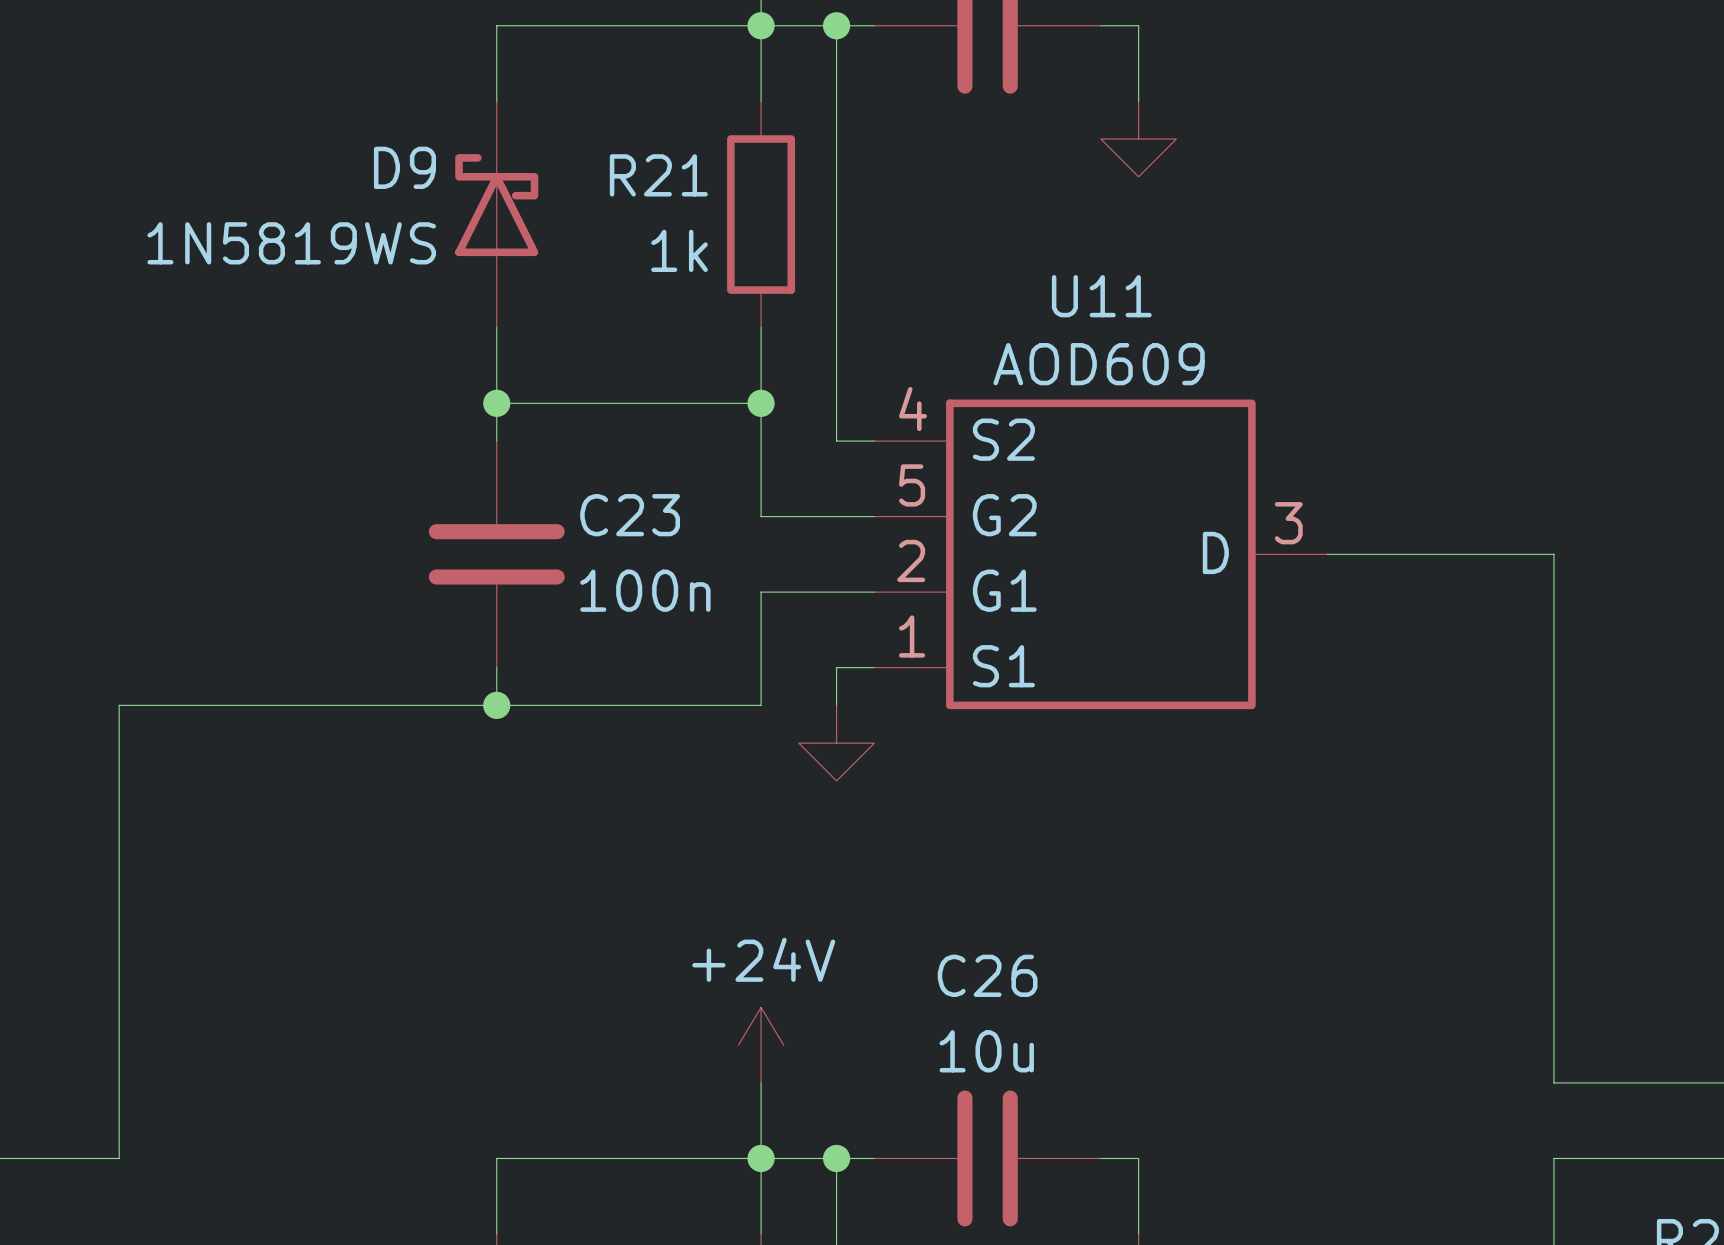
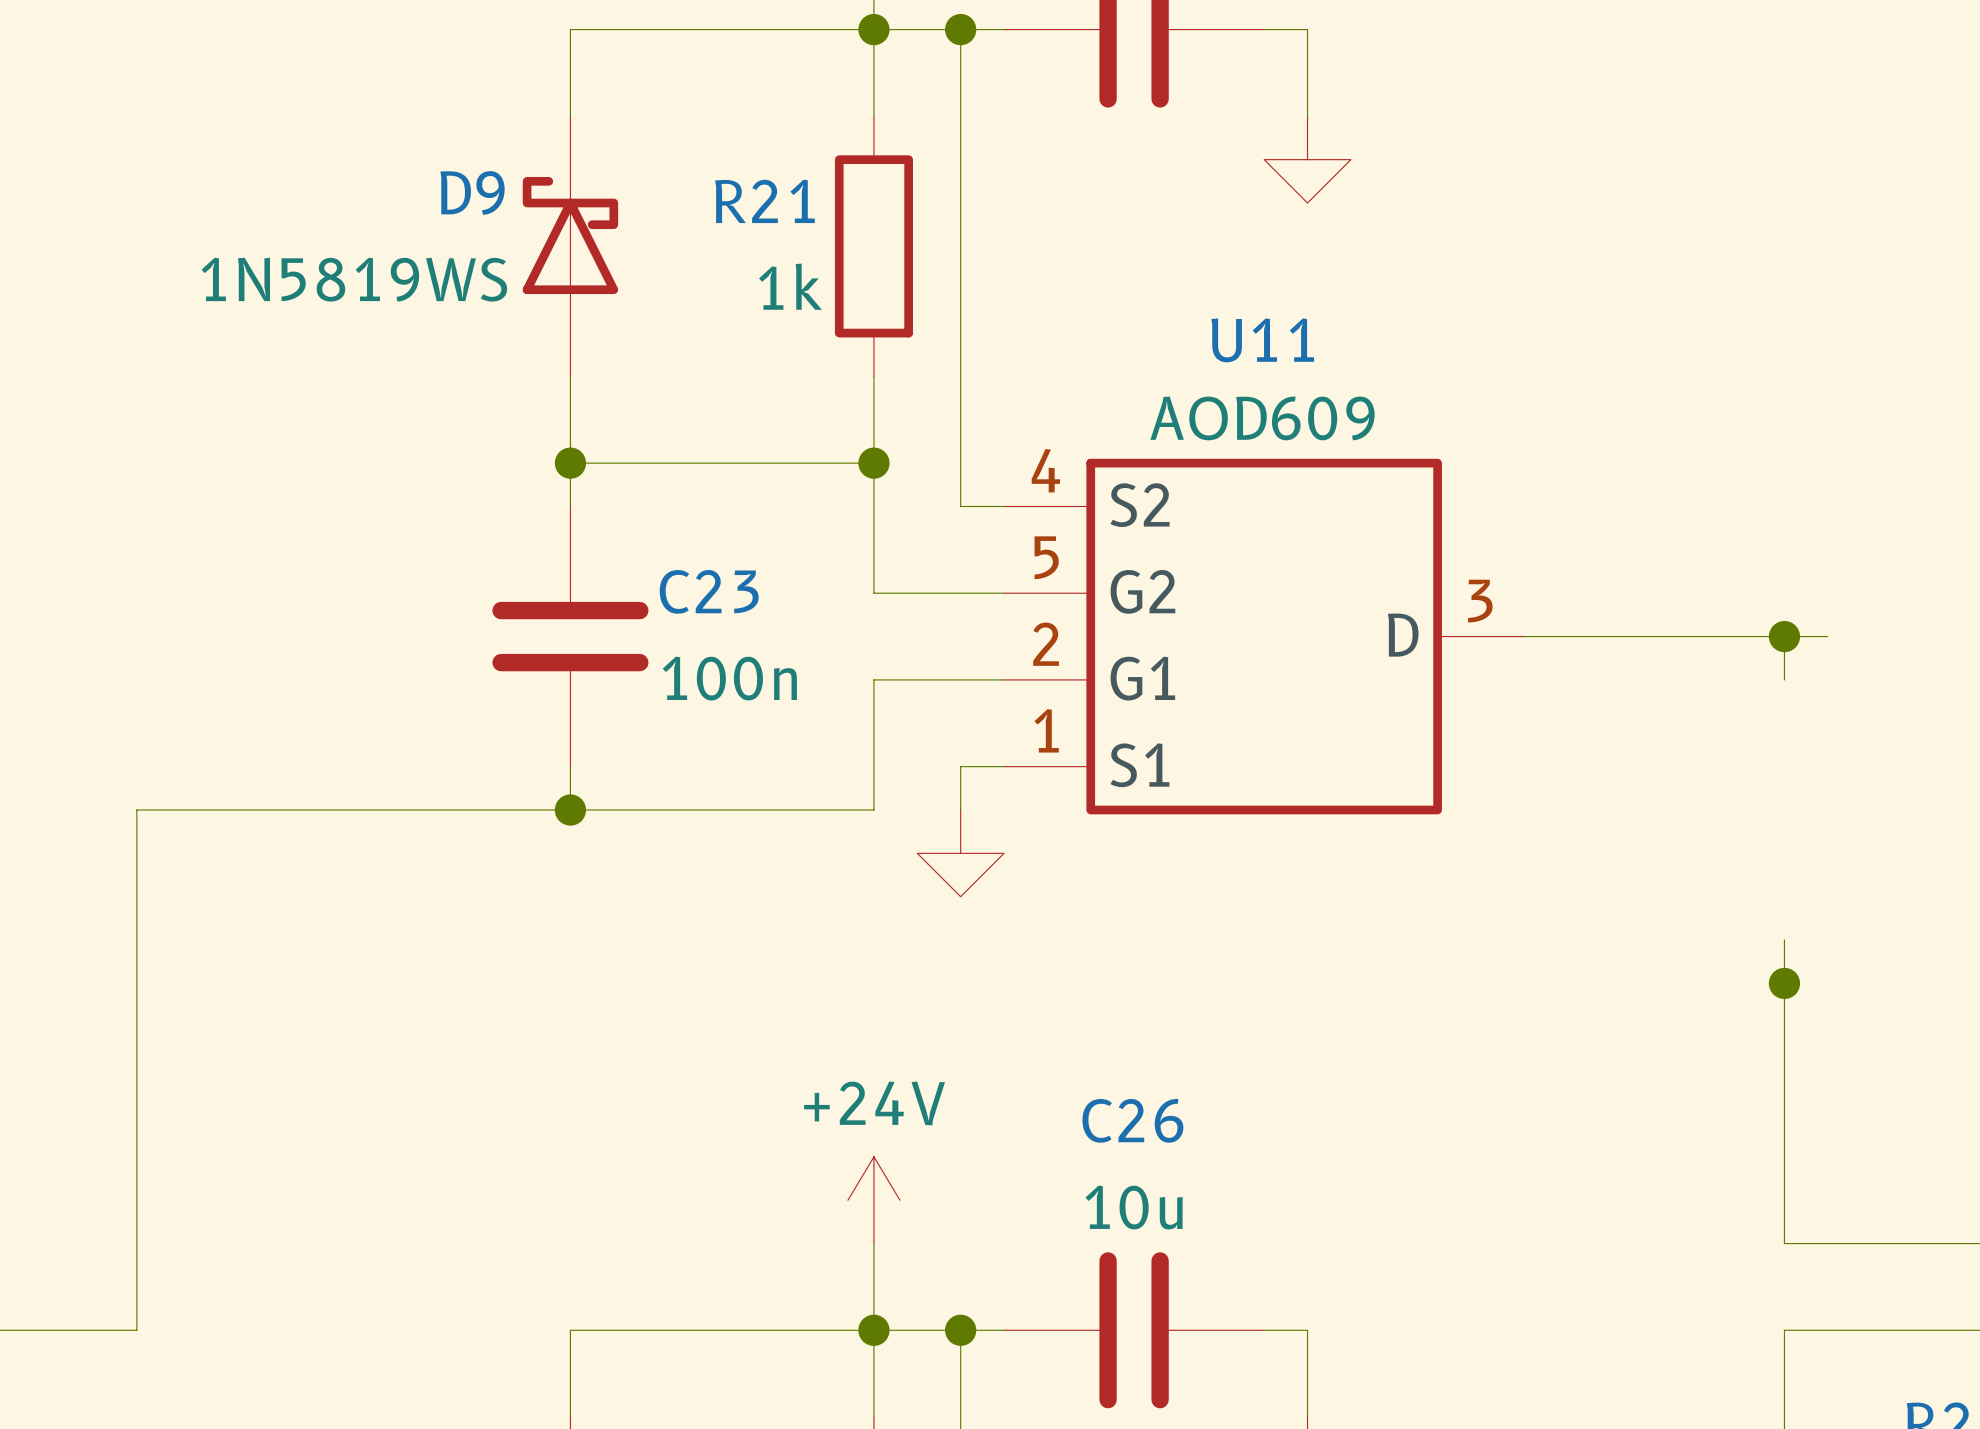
wire: none -> (1784, 636) (1827, 636)
junction: none -> (1784, 636)
wire: (1553, 592) (1553, 818) -> none
junction: none -> (1784, 983)

